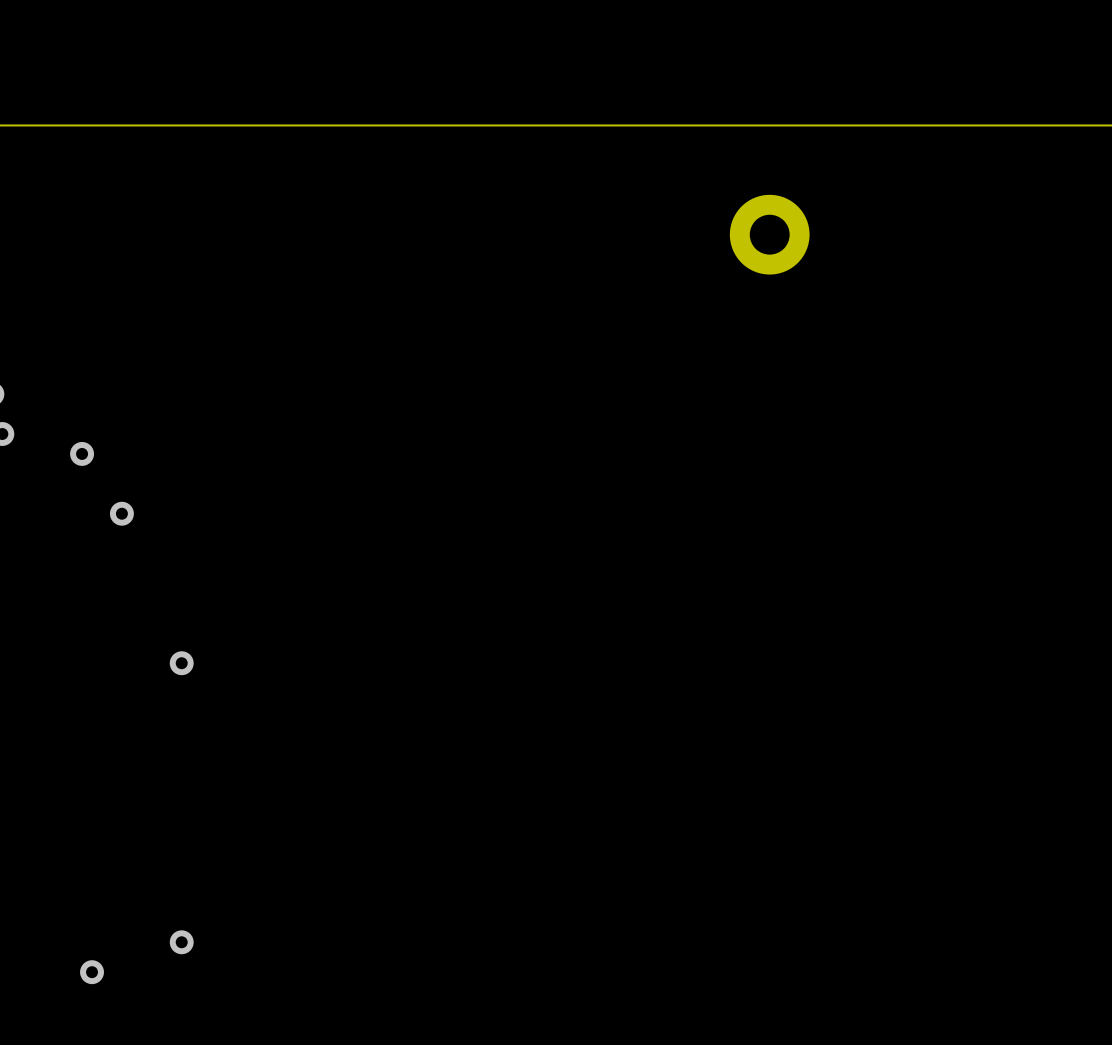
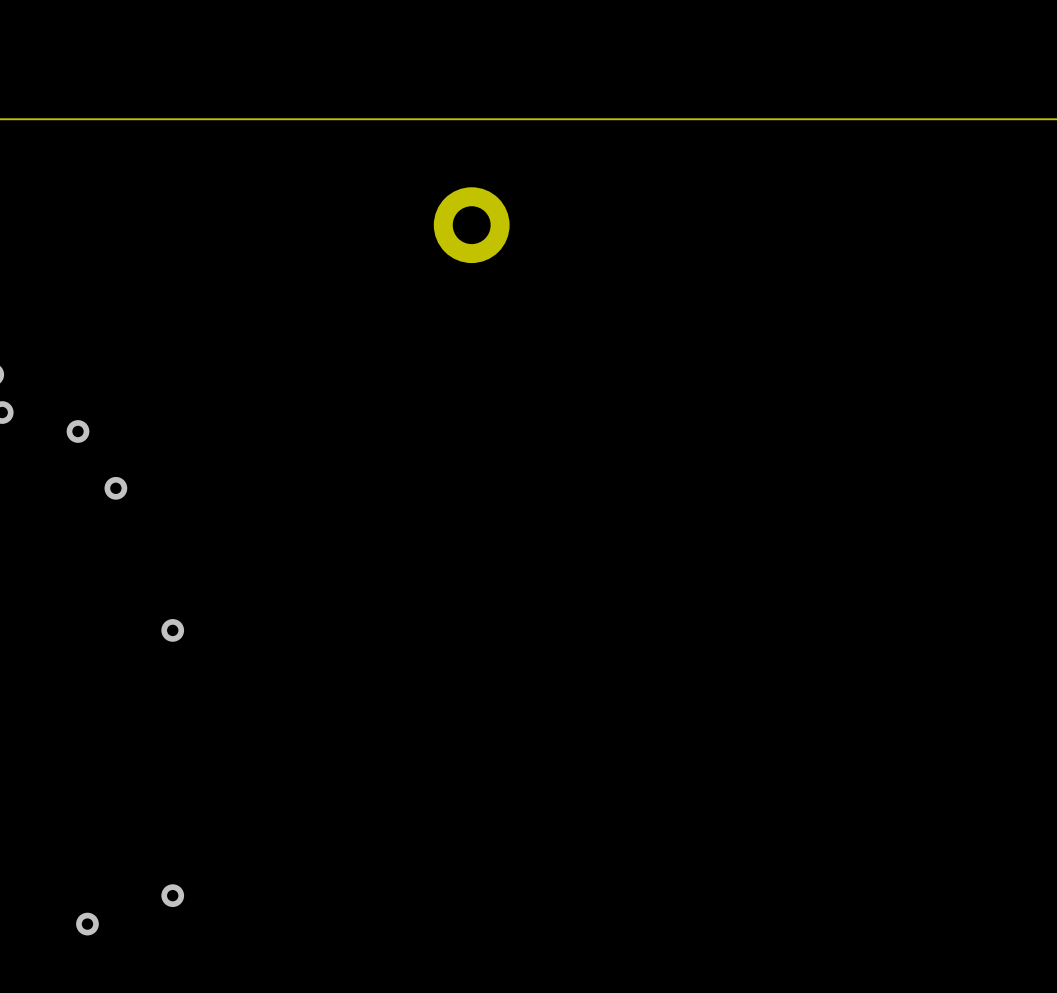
part position: (769, 234) -> (471, 225)

